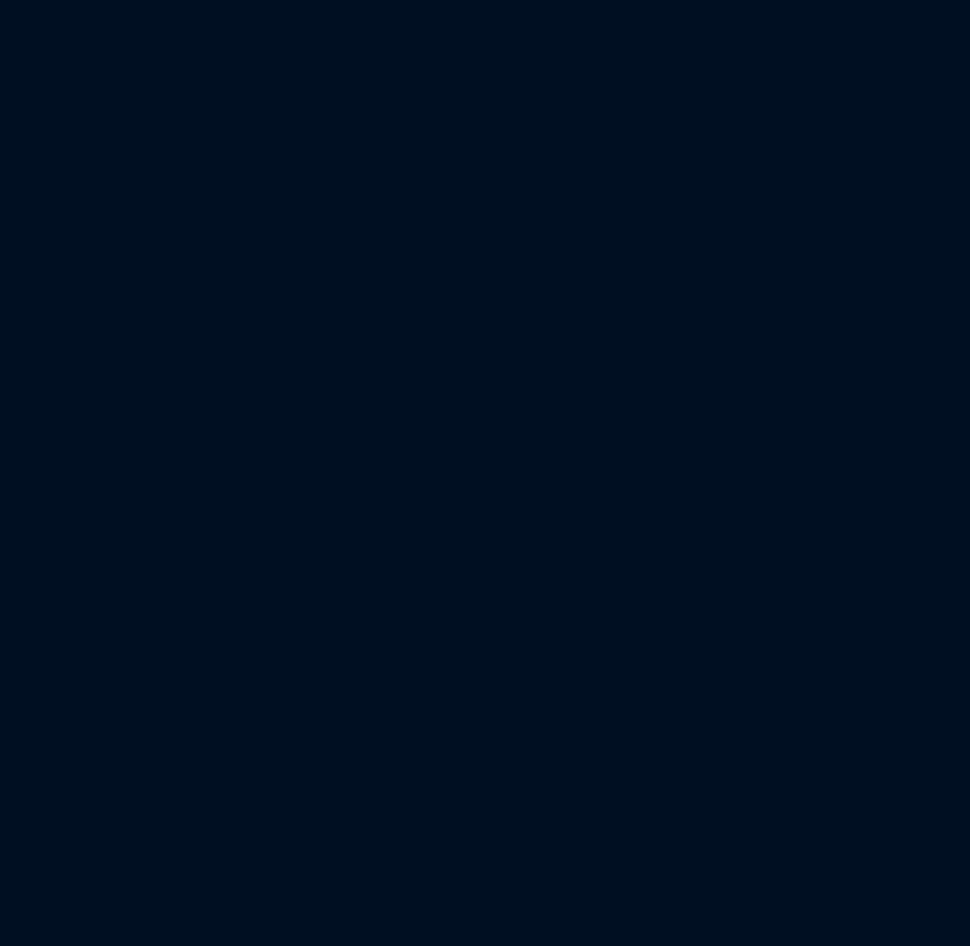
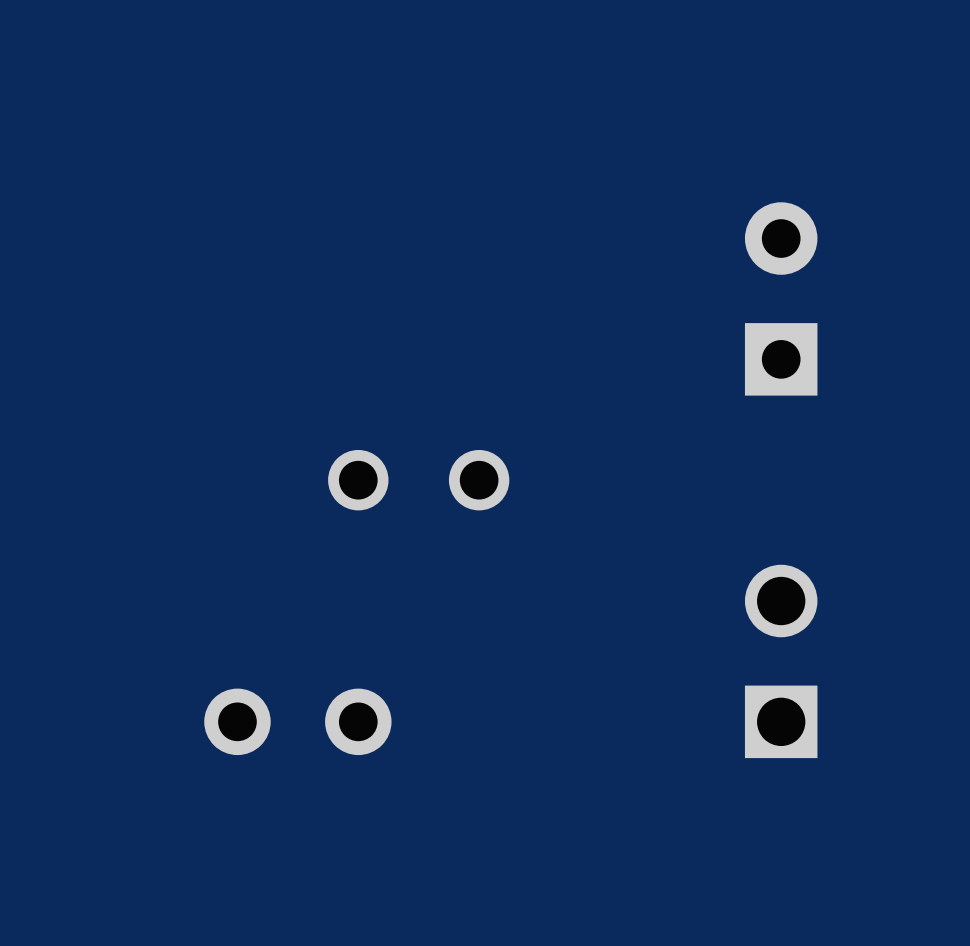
part: none -> (781, 298)
part: none -> (418, 480)
part: none -> (781, 661)
part: none -> (297, 721)

